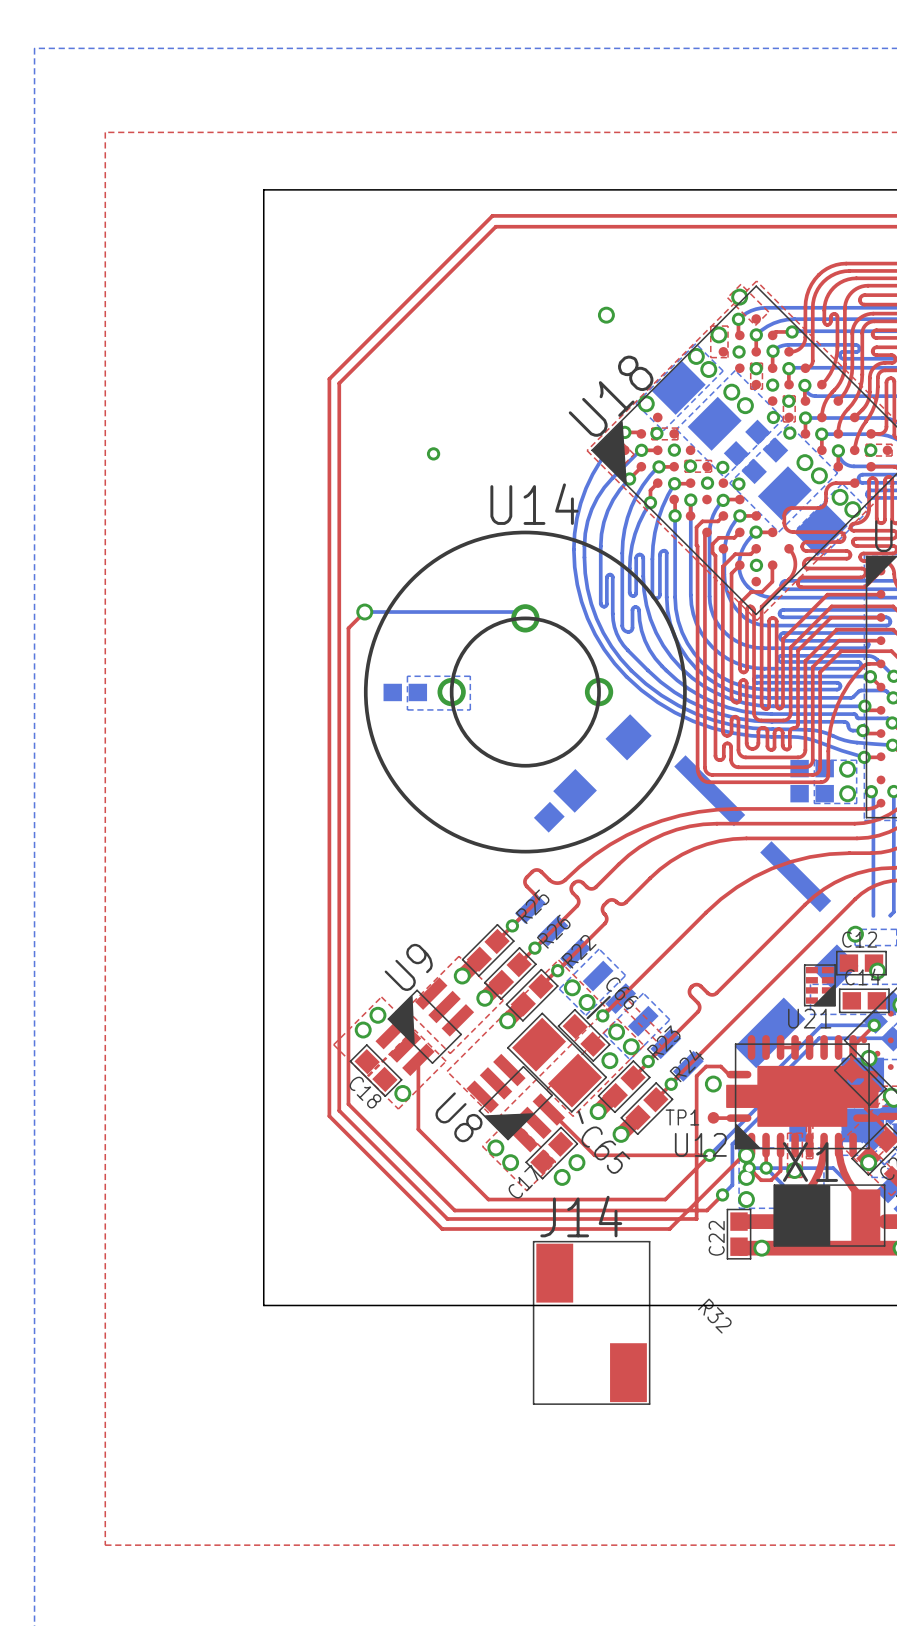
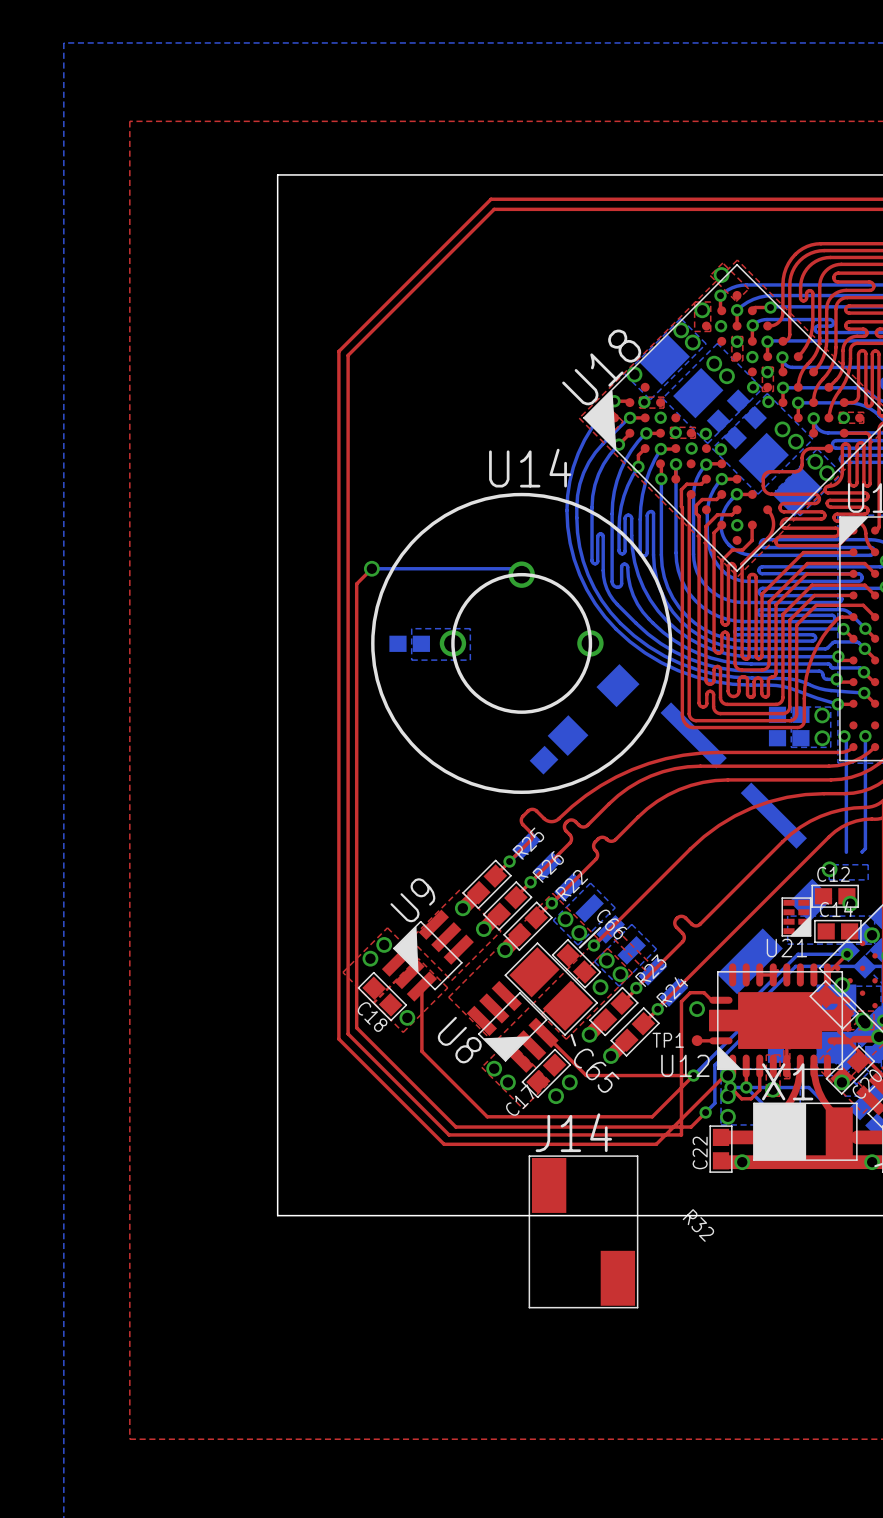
via: (606, 315) -> none
via: (433, 453) -> none

